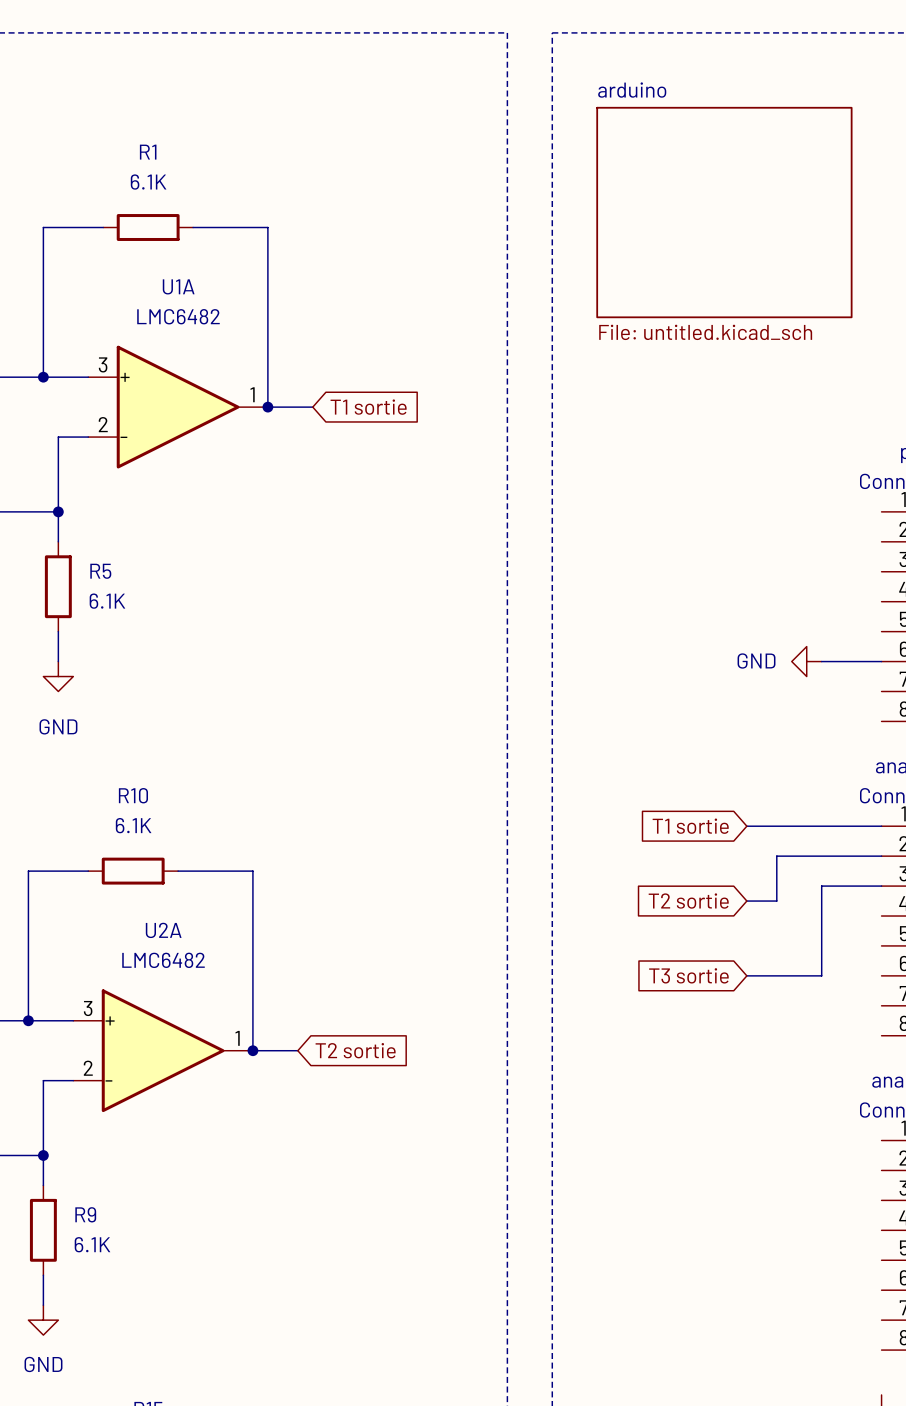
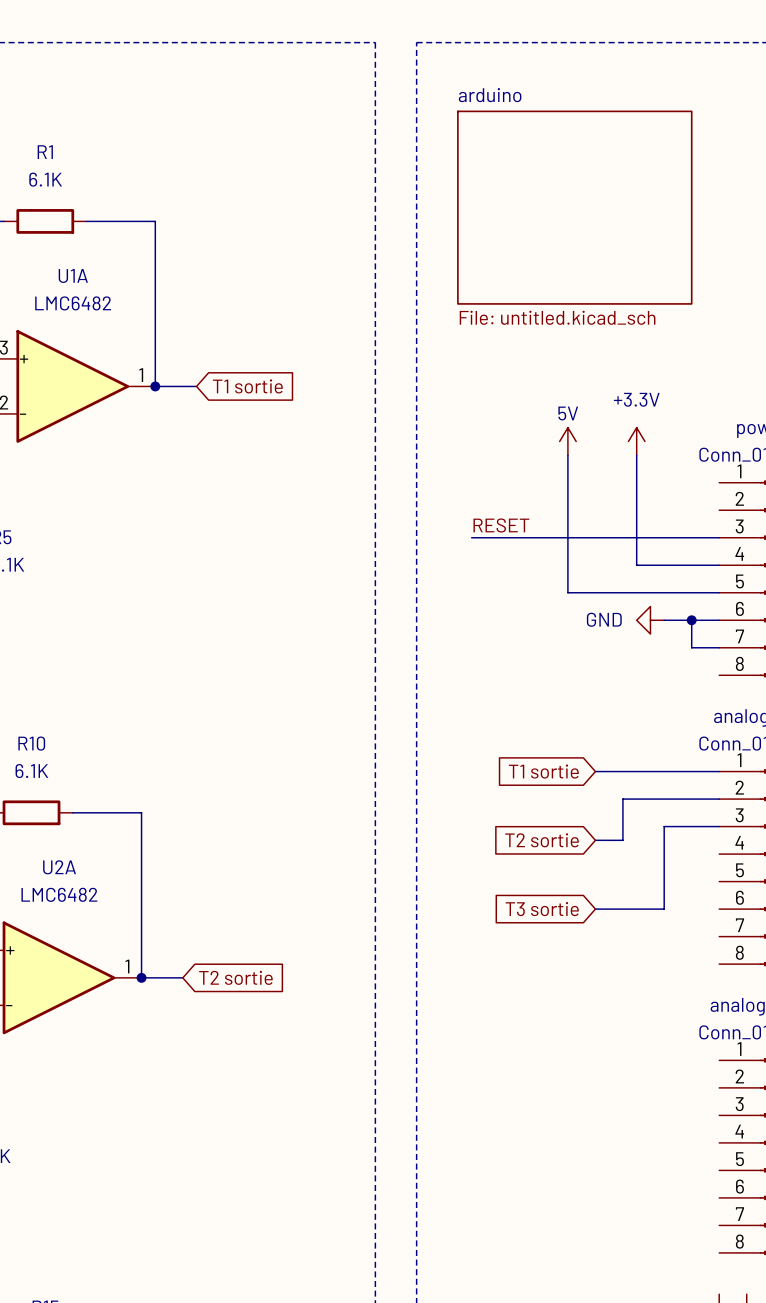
power symbol: none -> 5V (567, 441)
power symbol: none -> +3.3V (636, 441)
wire: none -> (567, 455) (567, 592) (719, 592)
wire: none -> (636, 455) (636, 565) (719, 565)
label: none -> RESET (501, 525)
wire: none -> (471, 537) (719, 537)
wire: none -> (691, 620) (691, 647) (719, 647)
junction: none -> (691, 620)

